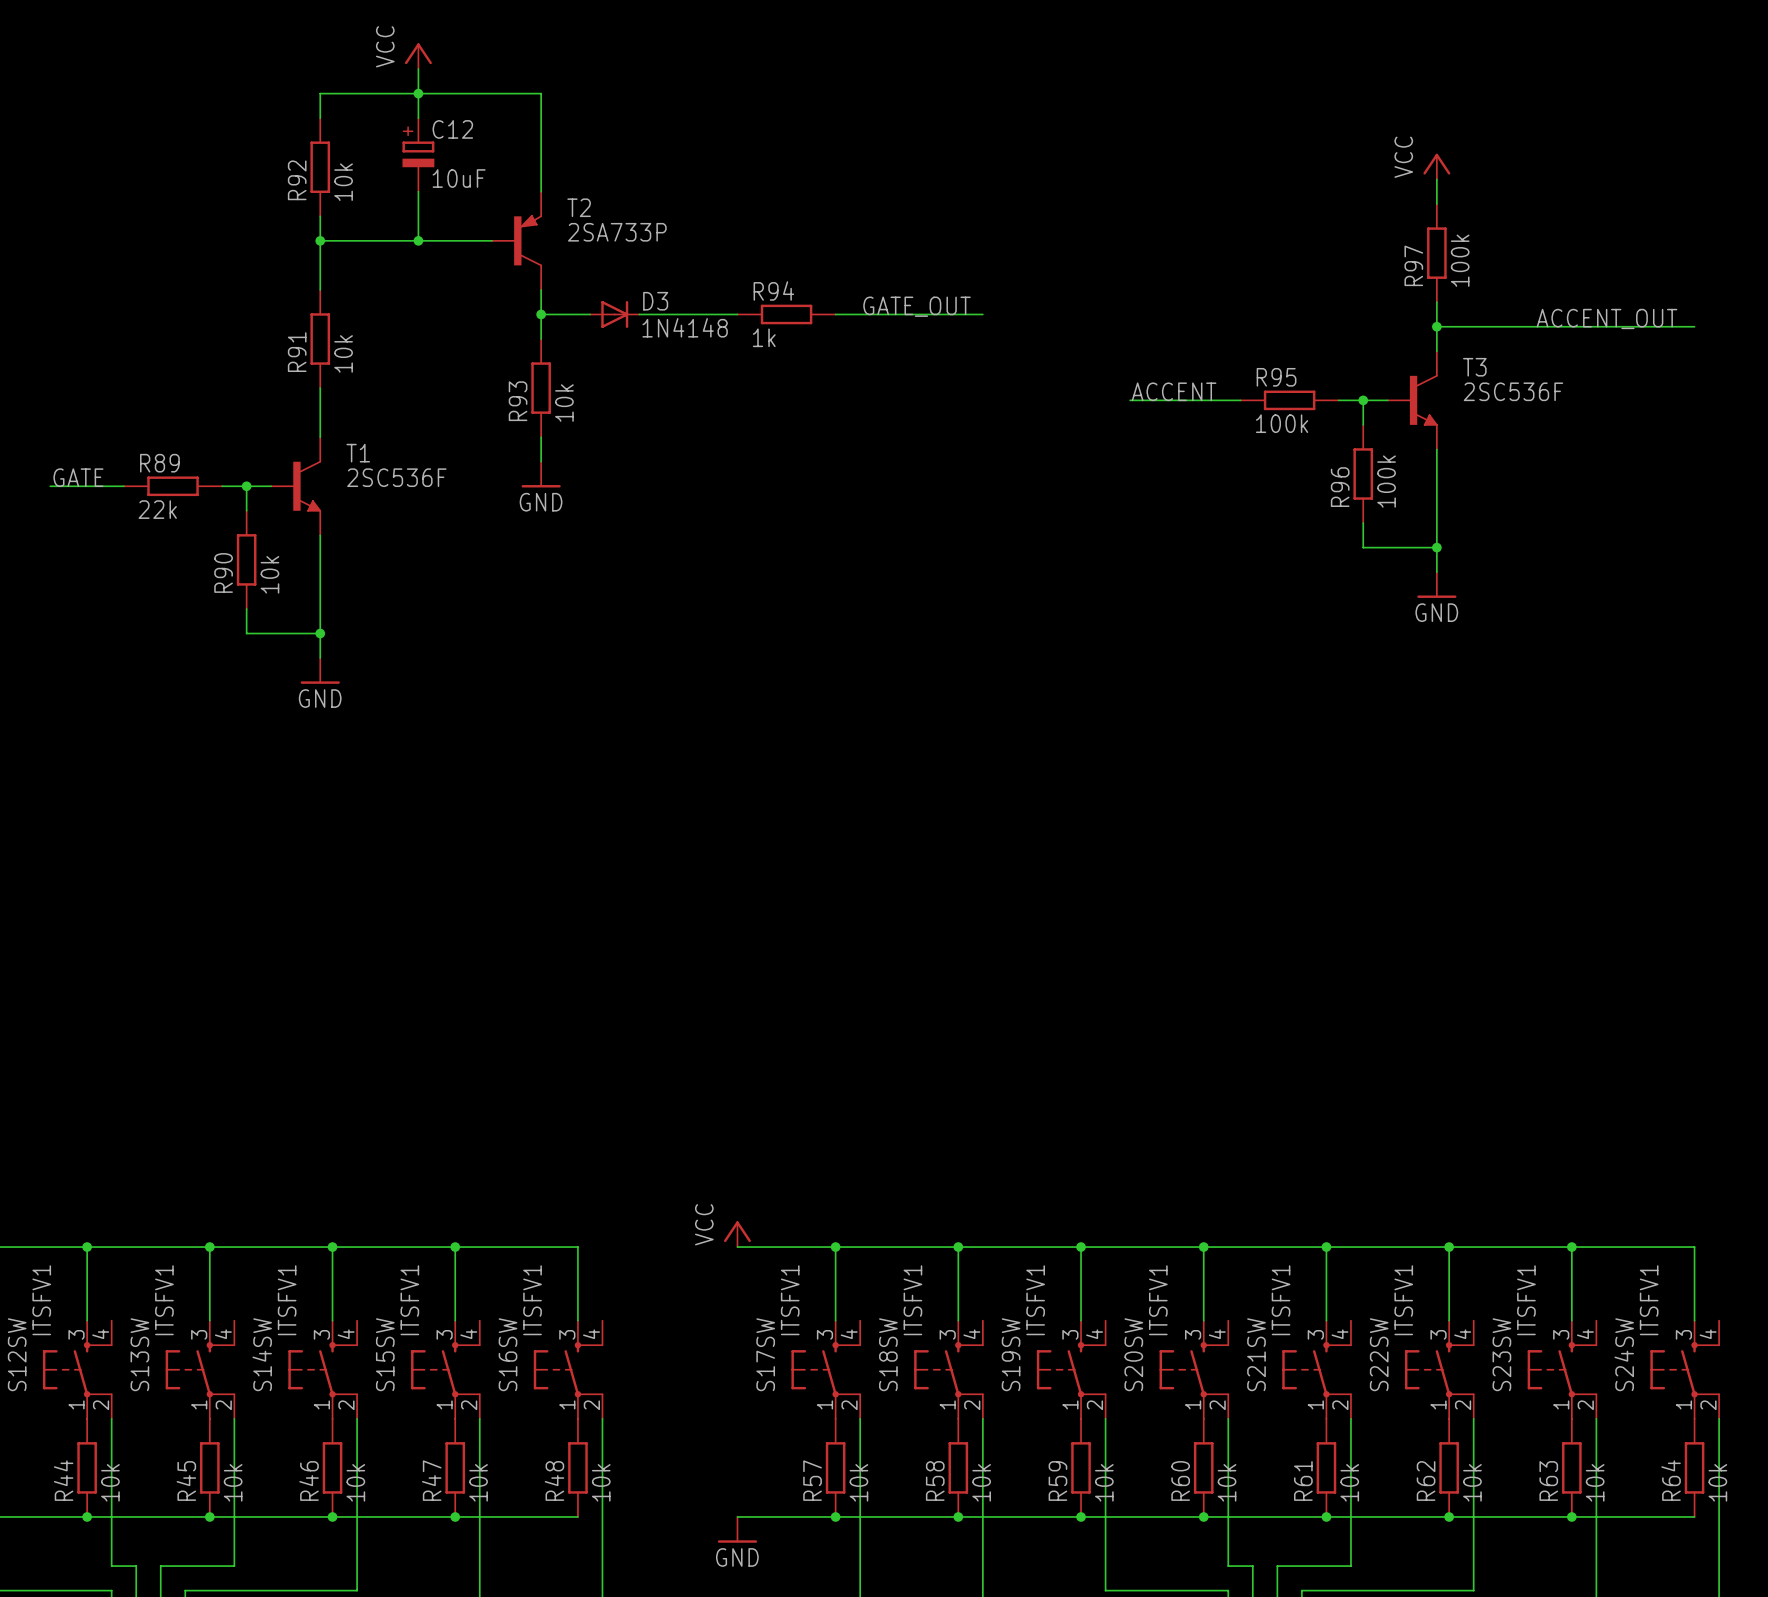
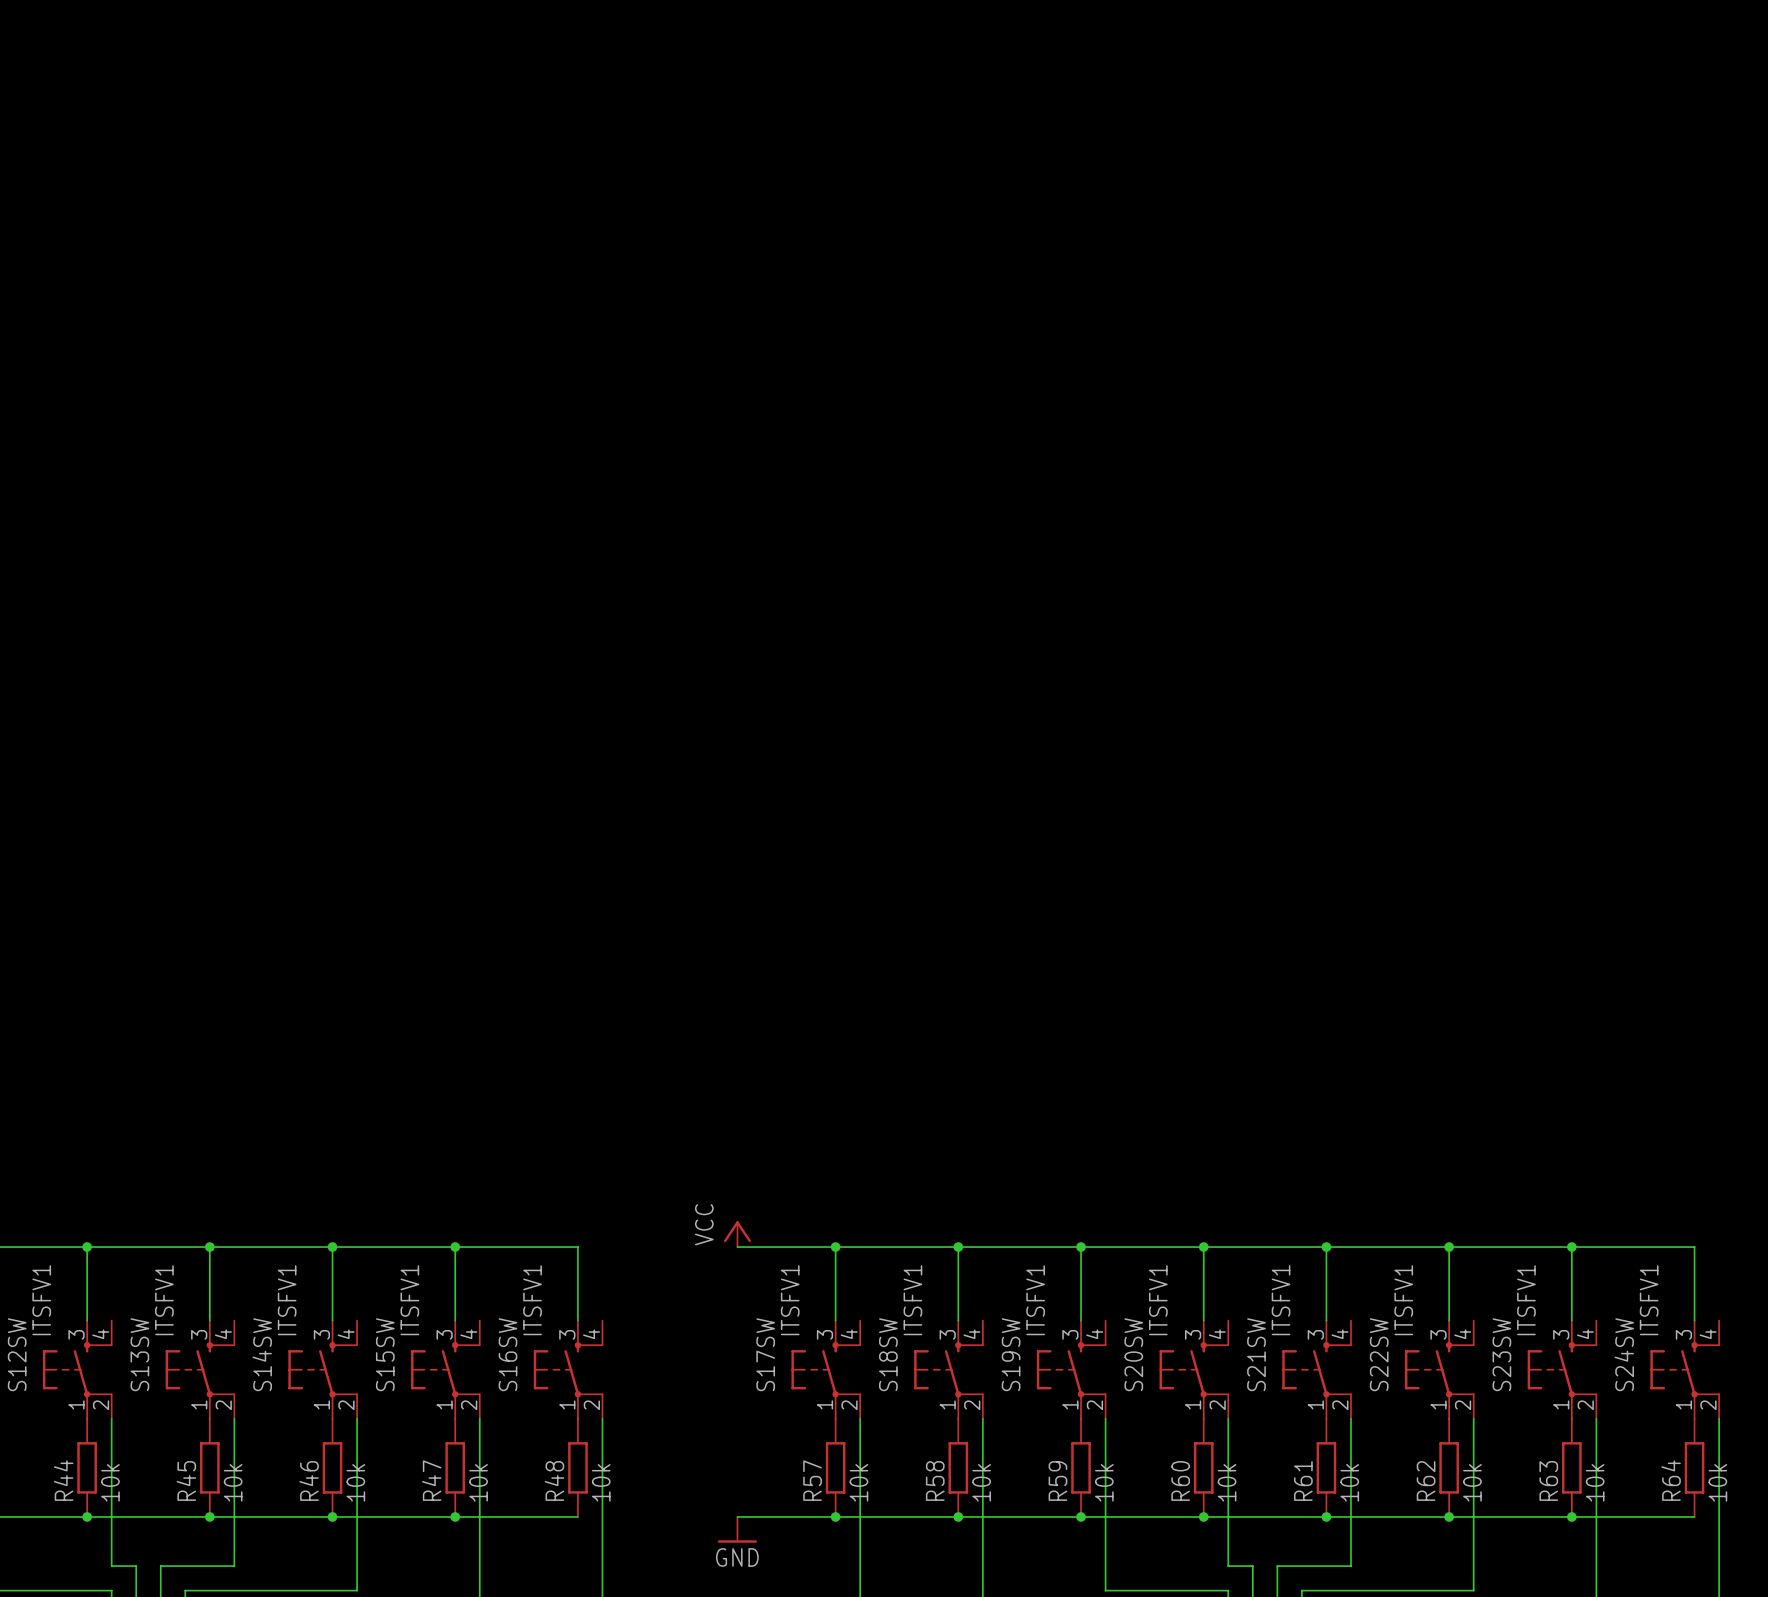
power symbol: VCC (418, 56) -> none
wire: (418, 69) (418, 118) -> none
junction: (418, 93) -> none
wire: (320, 118) (320, 93) (541, 93) (541, 191) -> none
C12: 10uF (418, 154) -> none
power symbol: VCC (1436, 166) -> none
R92: 10k (320, 167) -> none
wire: (1436, 179) (1436, 204) -> none
wire: (418, 191) (418, 240) -> none
wire: (320, 216) (320, 289) -> none
wire: (320, 240) (492, 240) -> none
junction: (320, 240) -> none
junction: (418, 240) -> none
T2: 2SA733P (516, 240) -> none
R97: 100k (1436, 253) -> none
wire: (541, 289) (541, 339) -> none
wire: (1436, 302) (1436, 351) -> none
label: GATE_OUT (917, 306) -> none
wire: (541, 314) (590, 314) -> none
junction: (541, 314) -> none
D3: 1N4148 (614, 314) -> none
wire: (639, 314) (737, 314) -> none
R94: 1k (786, 314) -> none
wire: (835, 314) (982, 314) -> none
label: ACCENT_OUT (1606, 318) -> none
wire: (1436, 326) (1694, 326) -> none
junction: (1436, 326) -> none
R91: 10k (320, 339) -> none
wire: (320, 388) (320, 437) -> none
R93: 10k (541, 388) -> none
label: ACCENT (1174, 391) -> none
wire: (1130, 400) (1240, 400) -> none
R95: 100k (1289, 400) -> none
wire: (1338, 400) (1387, 400) -> none
wire: (1363, 400) (1363, 424) -> none
junction: (1363, 400) -> none
T3: 2SC536F (1412, 400) -> none
wire: (541, 437) (541, 461) -> none
wire: (1436, 449) (1436, 572) -> none
power symbol: GND (541, 474) -> none
R96: 100k (1363, 474) -> none
label: GATE (78, 477) -> none
wire: (50, 486) (123, 486) -> none
R89: 22k (173, 486) -> none
wire: (222, 486) (271, 486) -> none
wire: (246, 486) (246, 510) -> none
junction: (246, 486) -> none
T1: 2SC536F (296, 486) -> none
wire: (1363, 523) (1363, 547) (1436, 547) -> none
wire: (320, 535) (320, 658) -> none
junction: (1436, 547) -> none
R90: 10k (246, 559) -> none
power symbol: GND (1436, 585) -> none
wire: (246, 608) (246, 633) (320, 633) -> none
junction: (320, 633) -> none
power symbol: GND (320, 670) -> none

